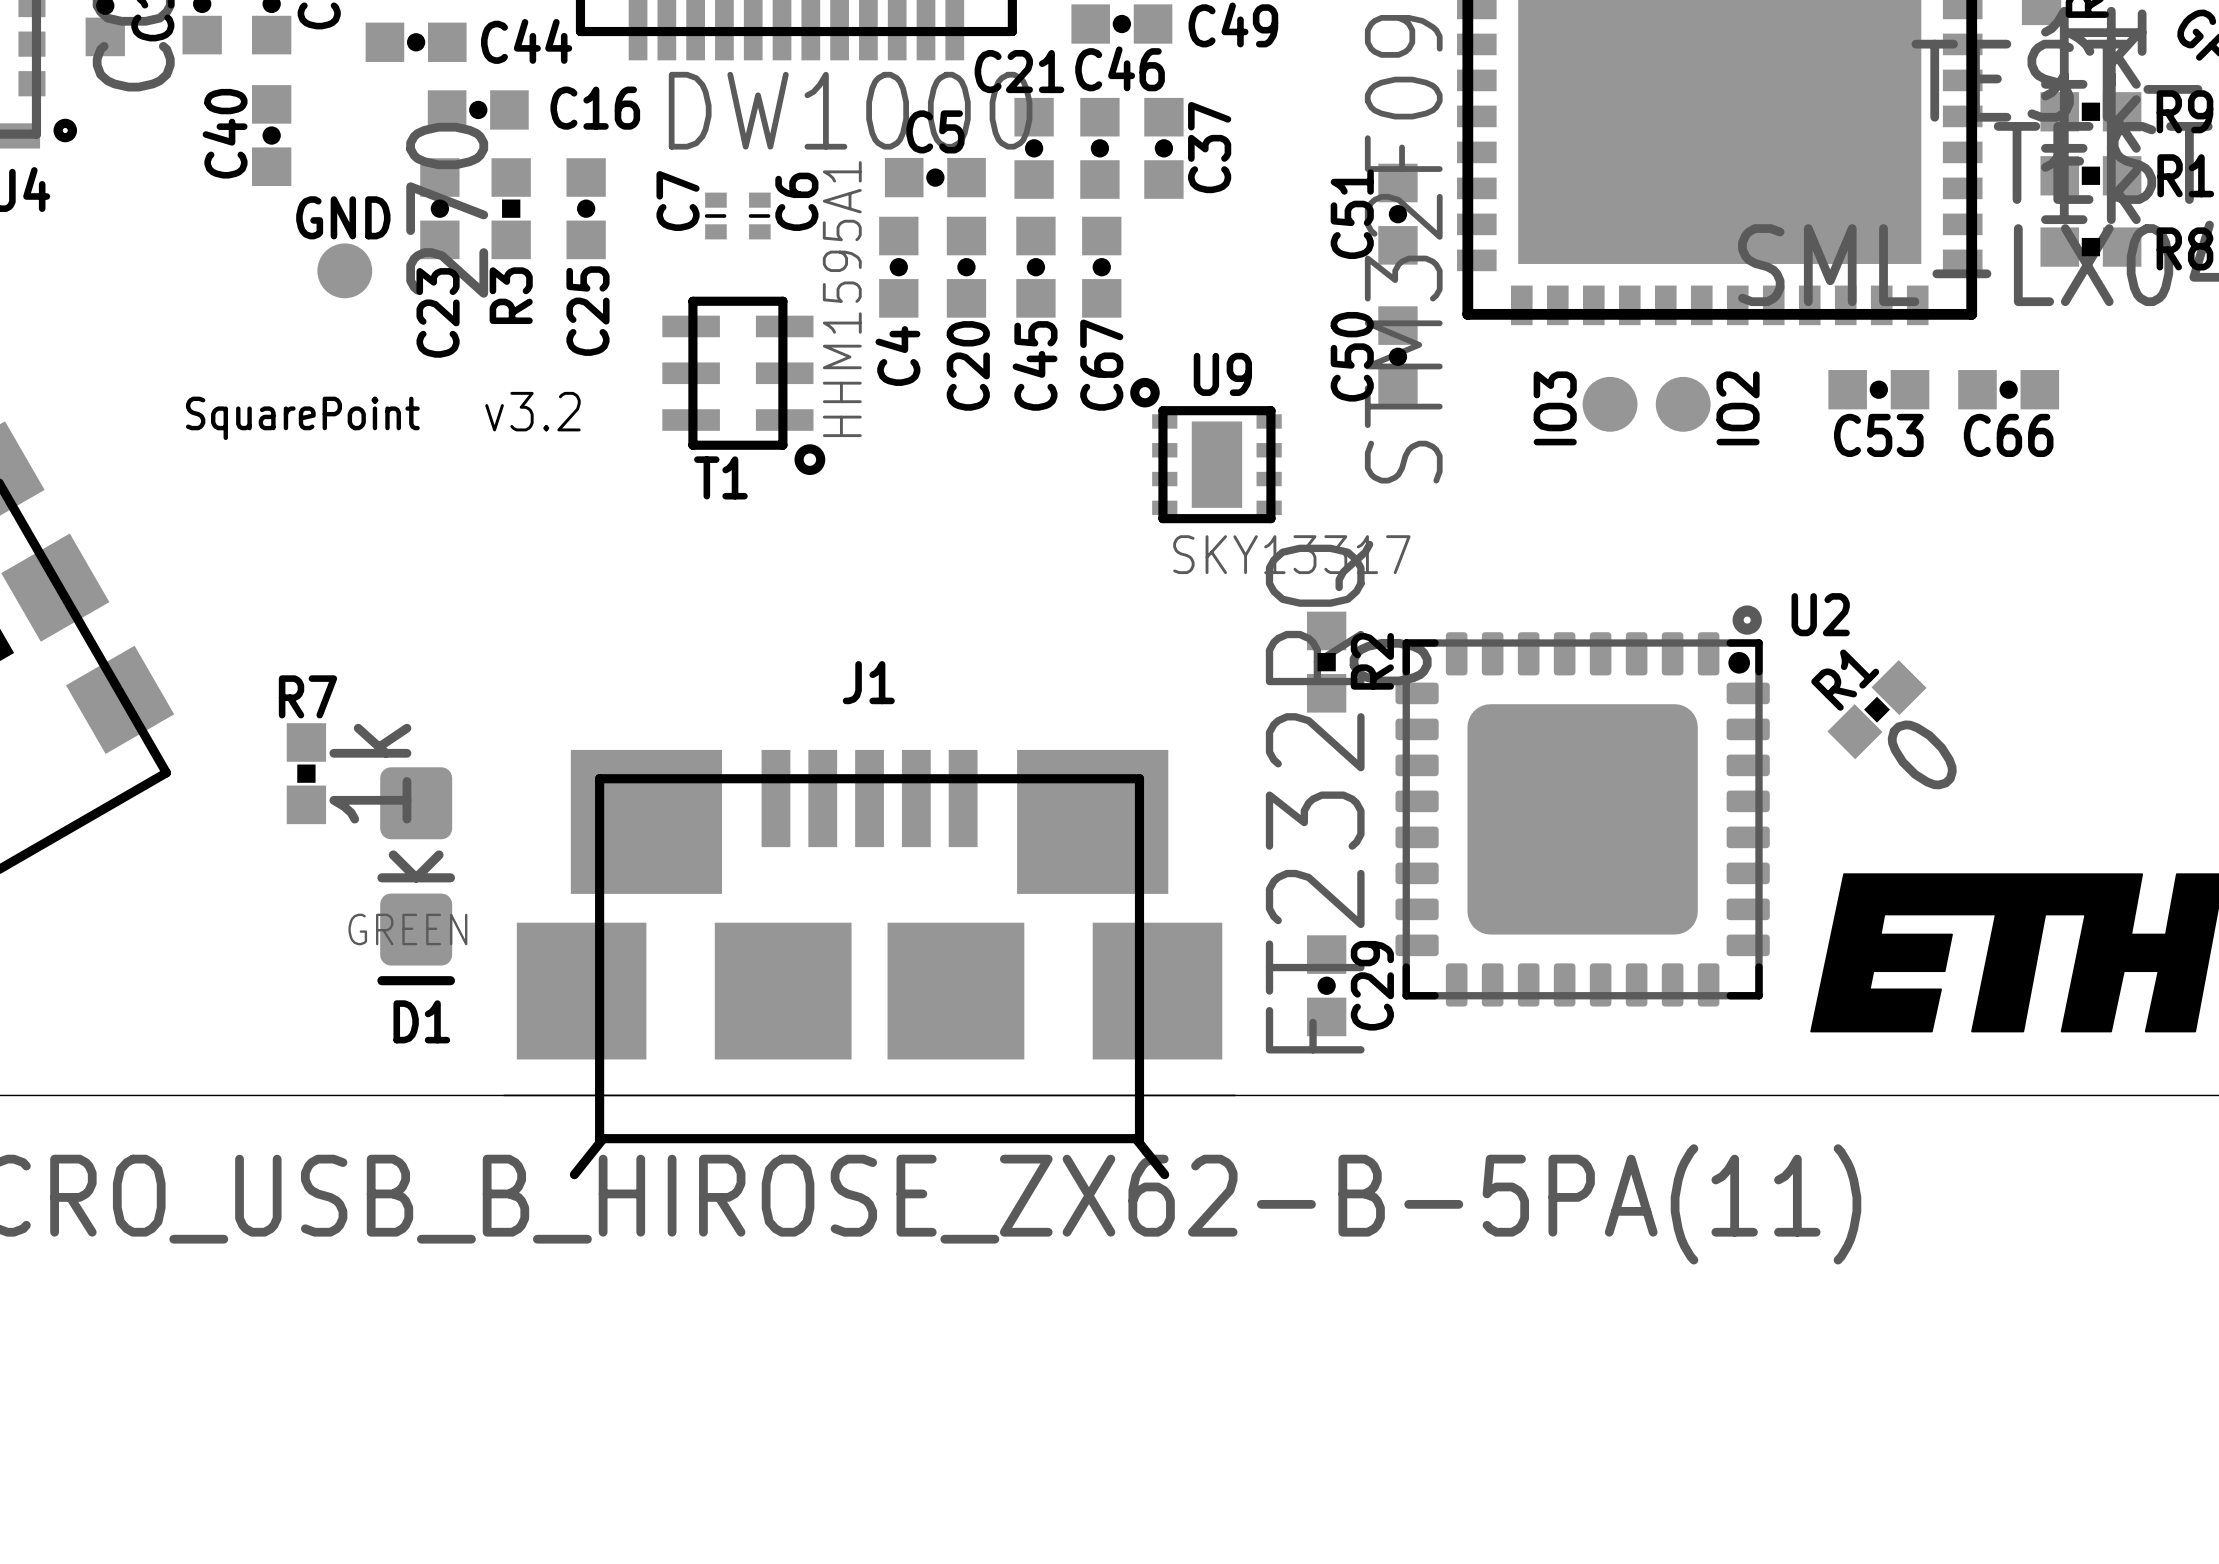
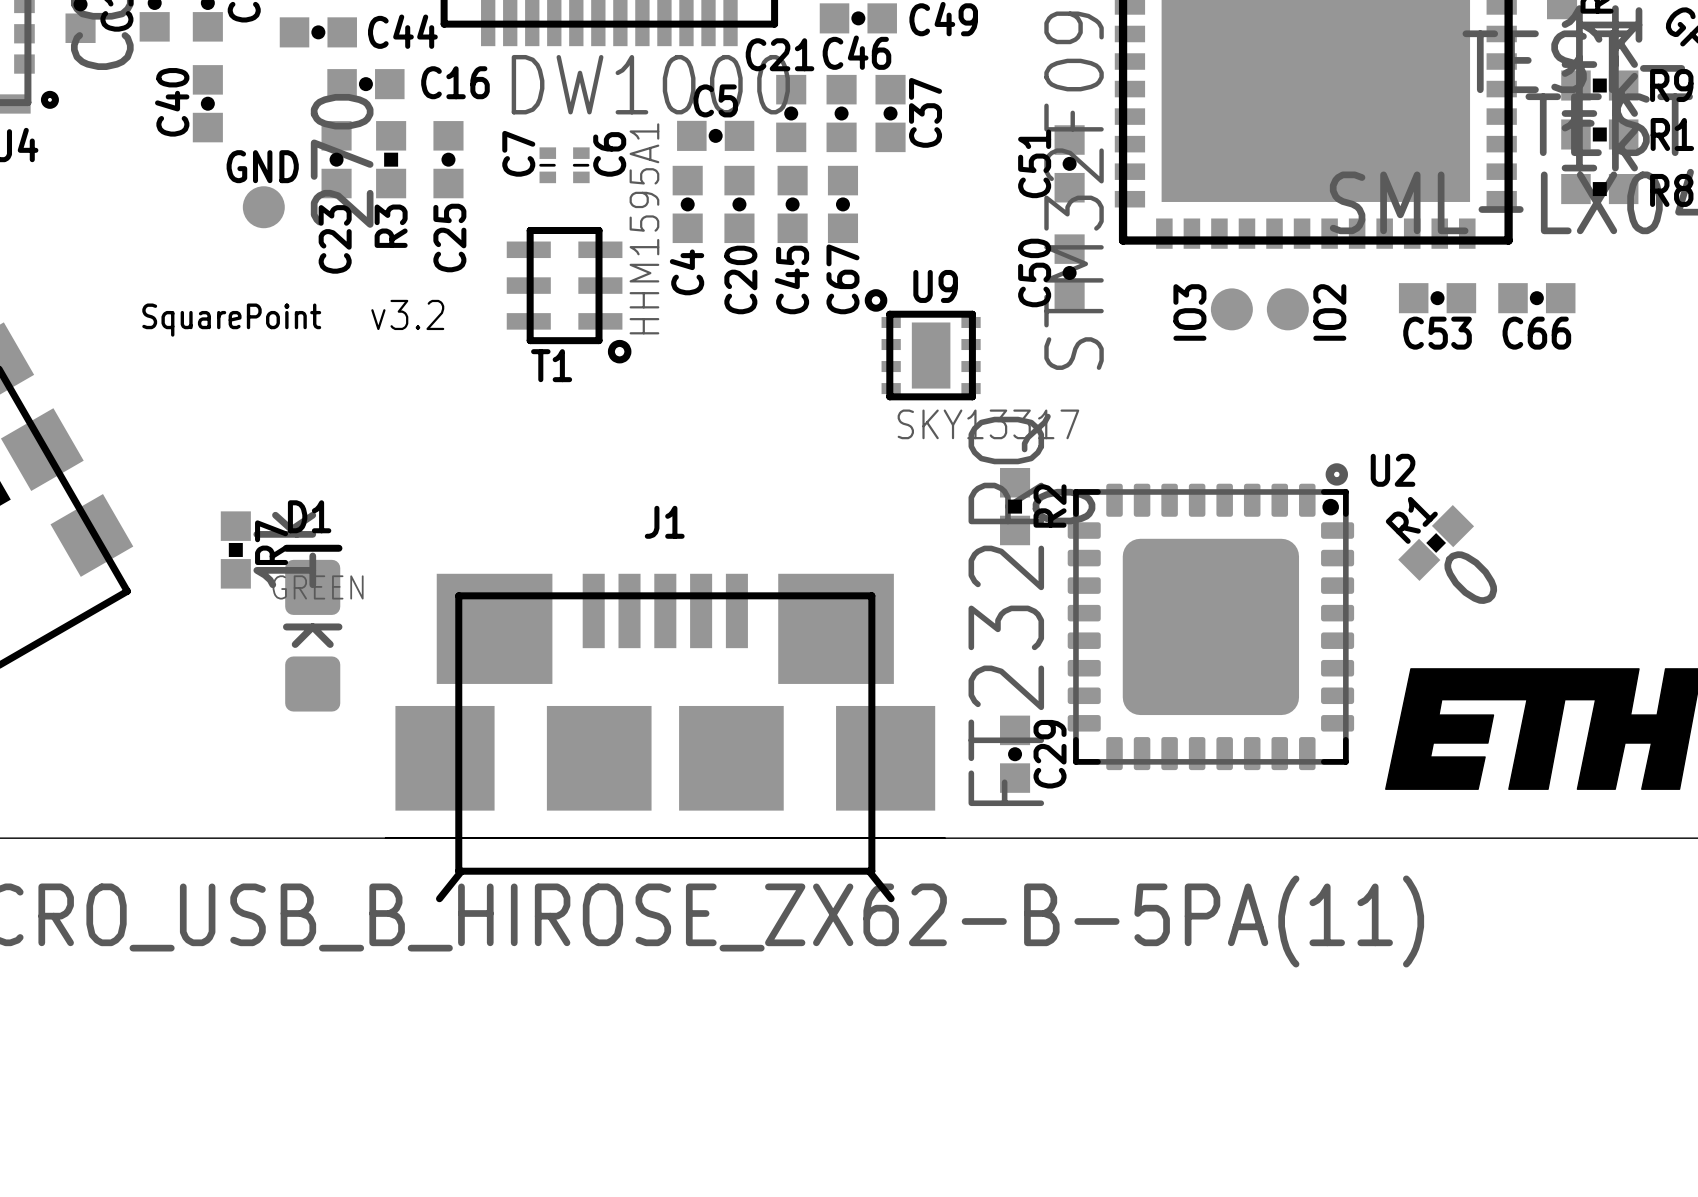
R7 name rotation: 0° (307, 696) -> 90° counterclockwise (271, 542)
R7 position: (306, 773) -> (235, 549)
D1 rotation: 0° (416, 876) -> 180° (312, 628)

